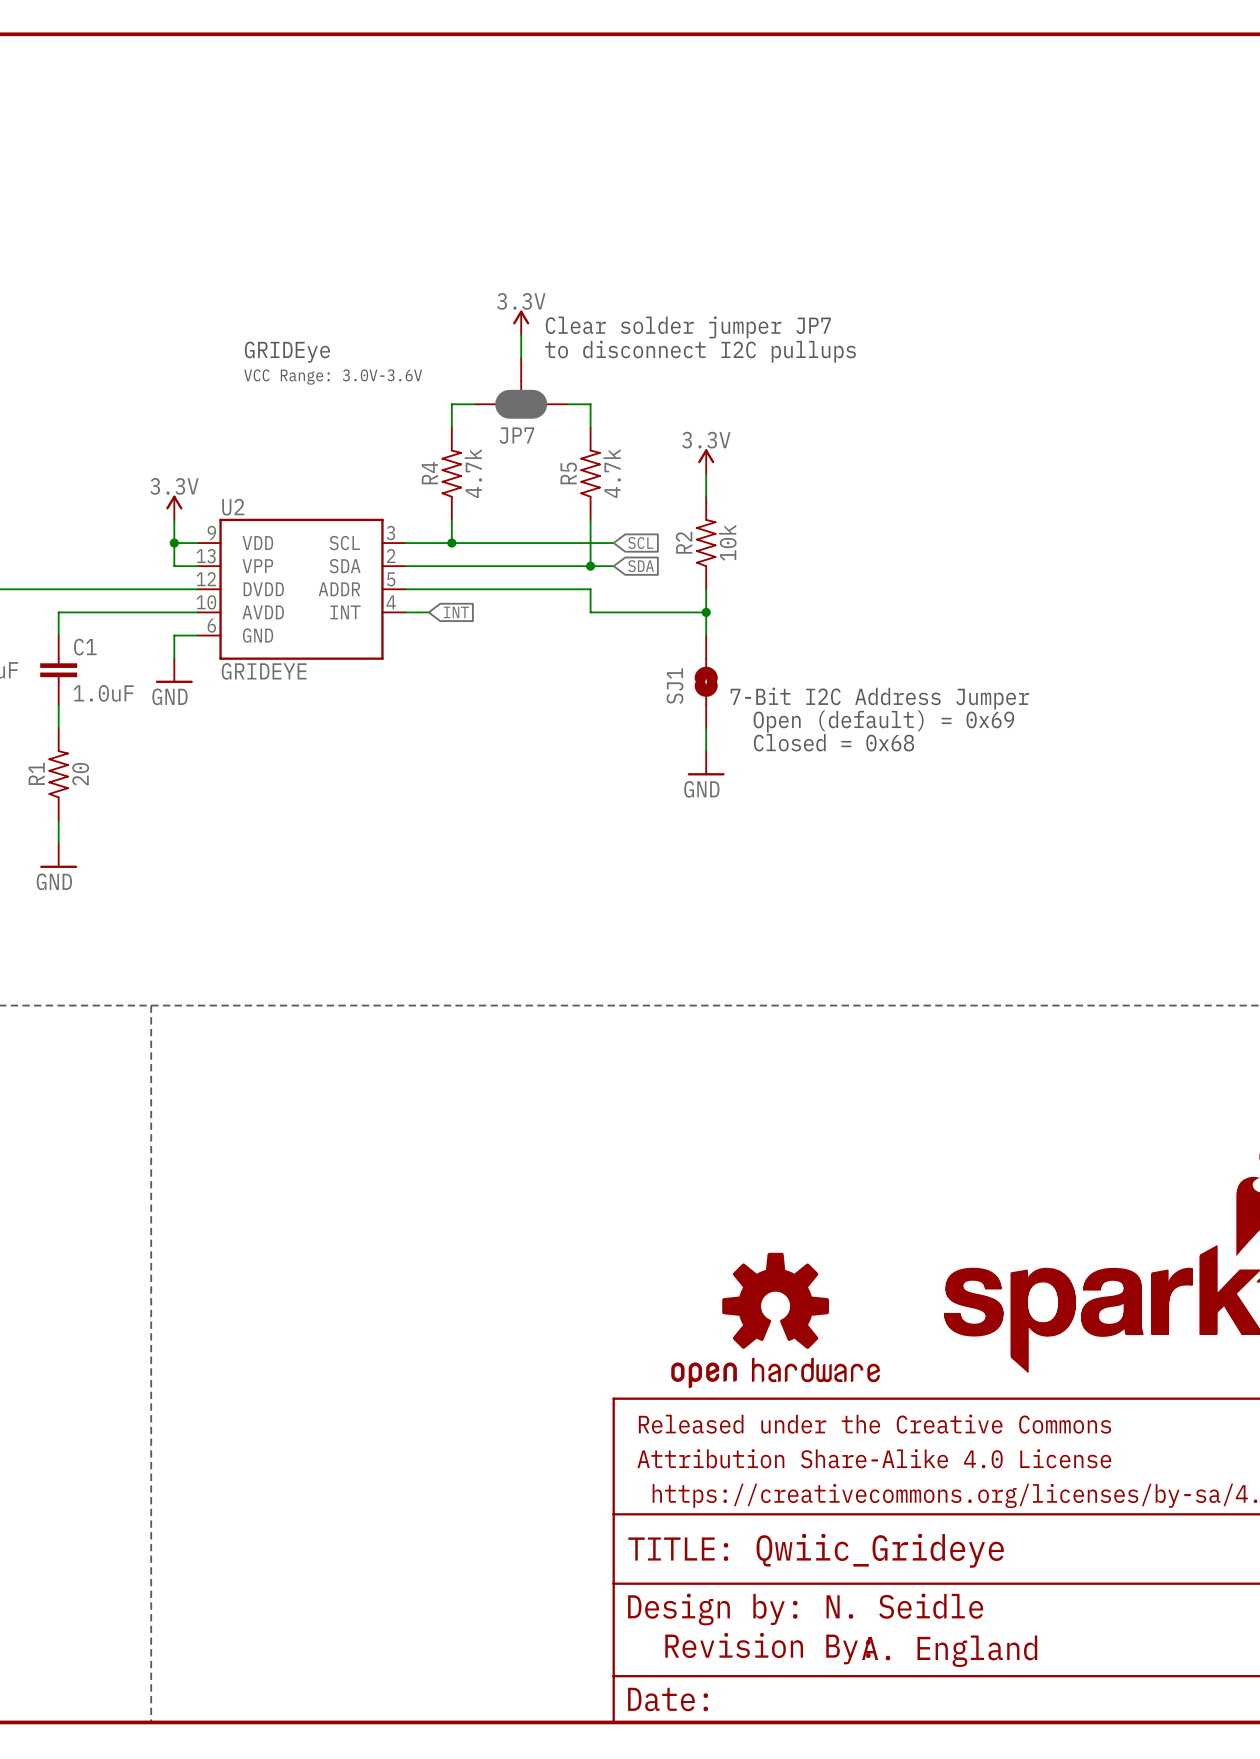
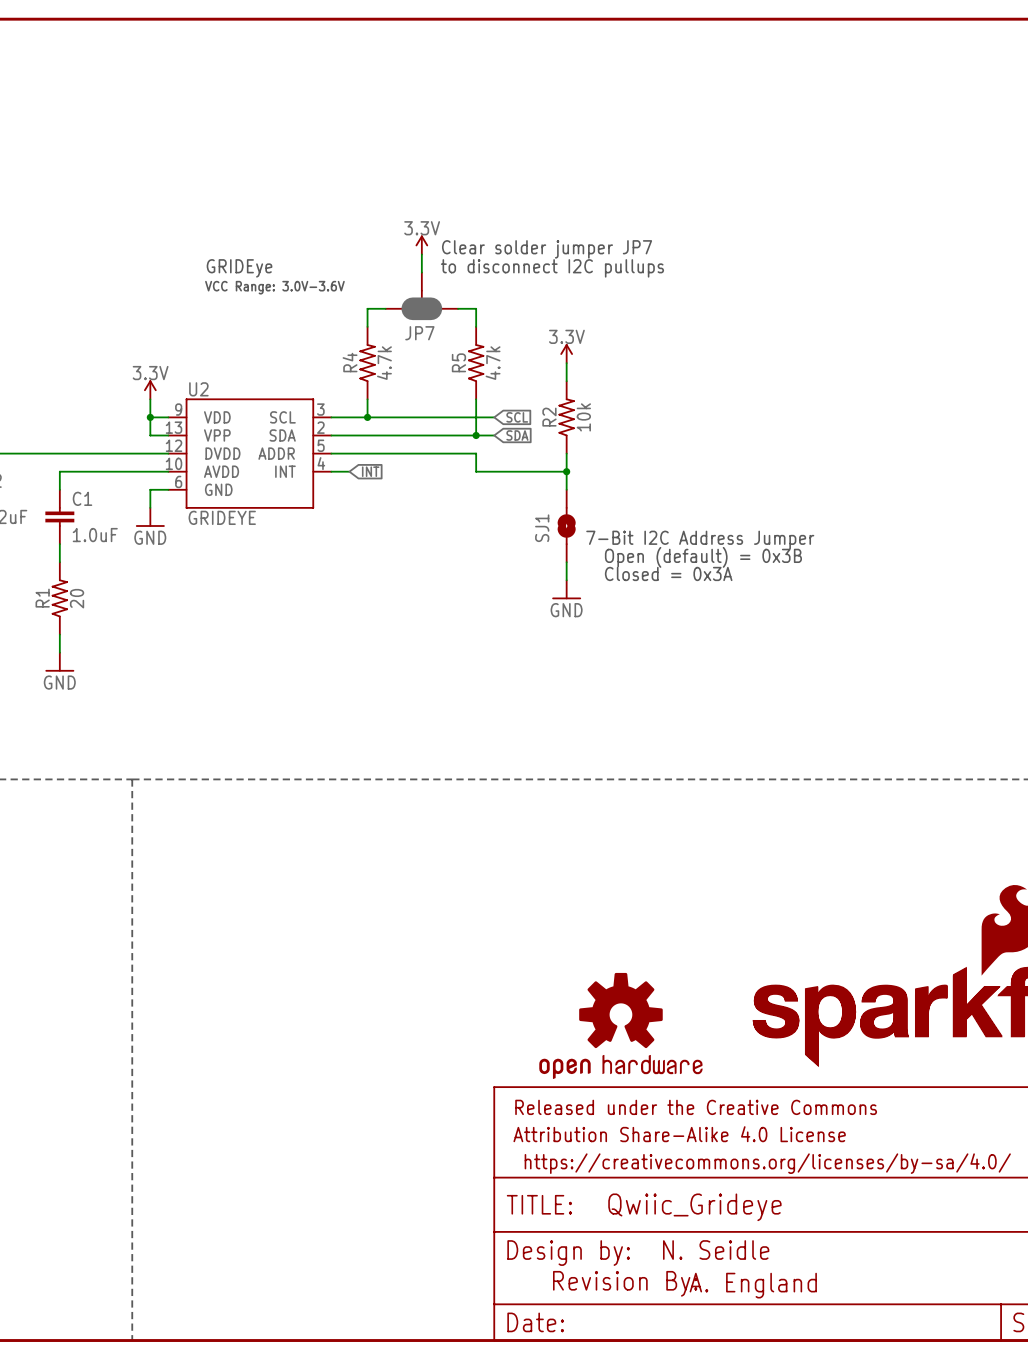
text: Open (default) = 0x69 (883, 721) -> Open (default) = 0x3B (703, 557)
text: Closed = 0x68 (834, 742) -> Closed = 0x3A (668, 573)

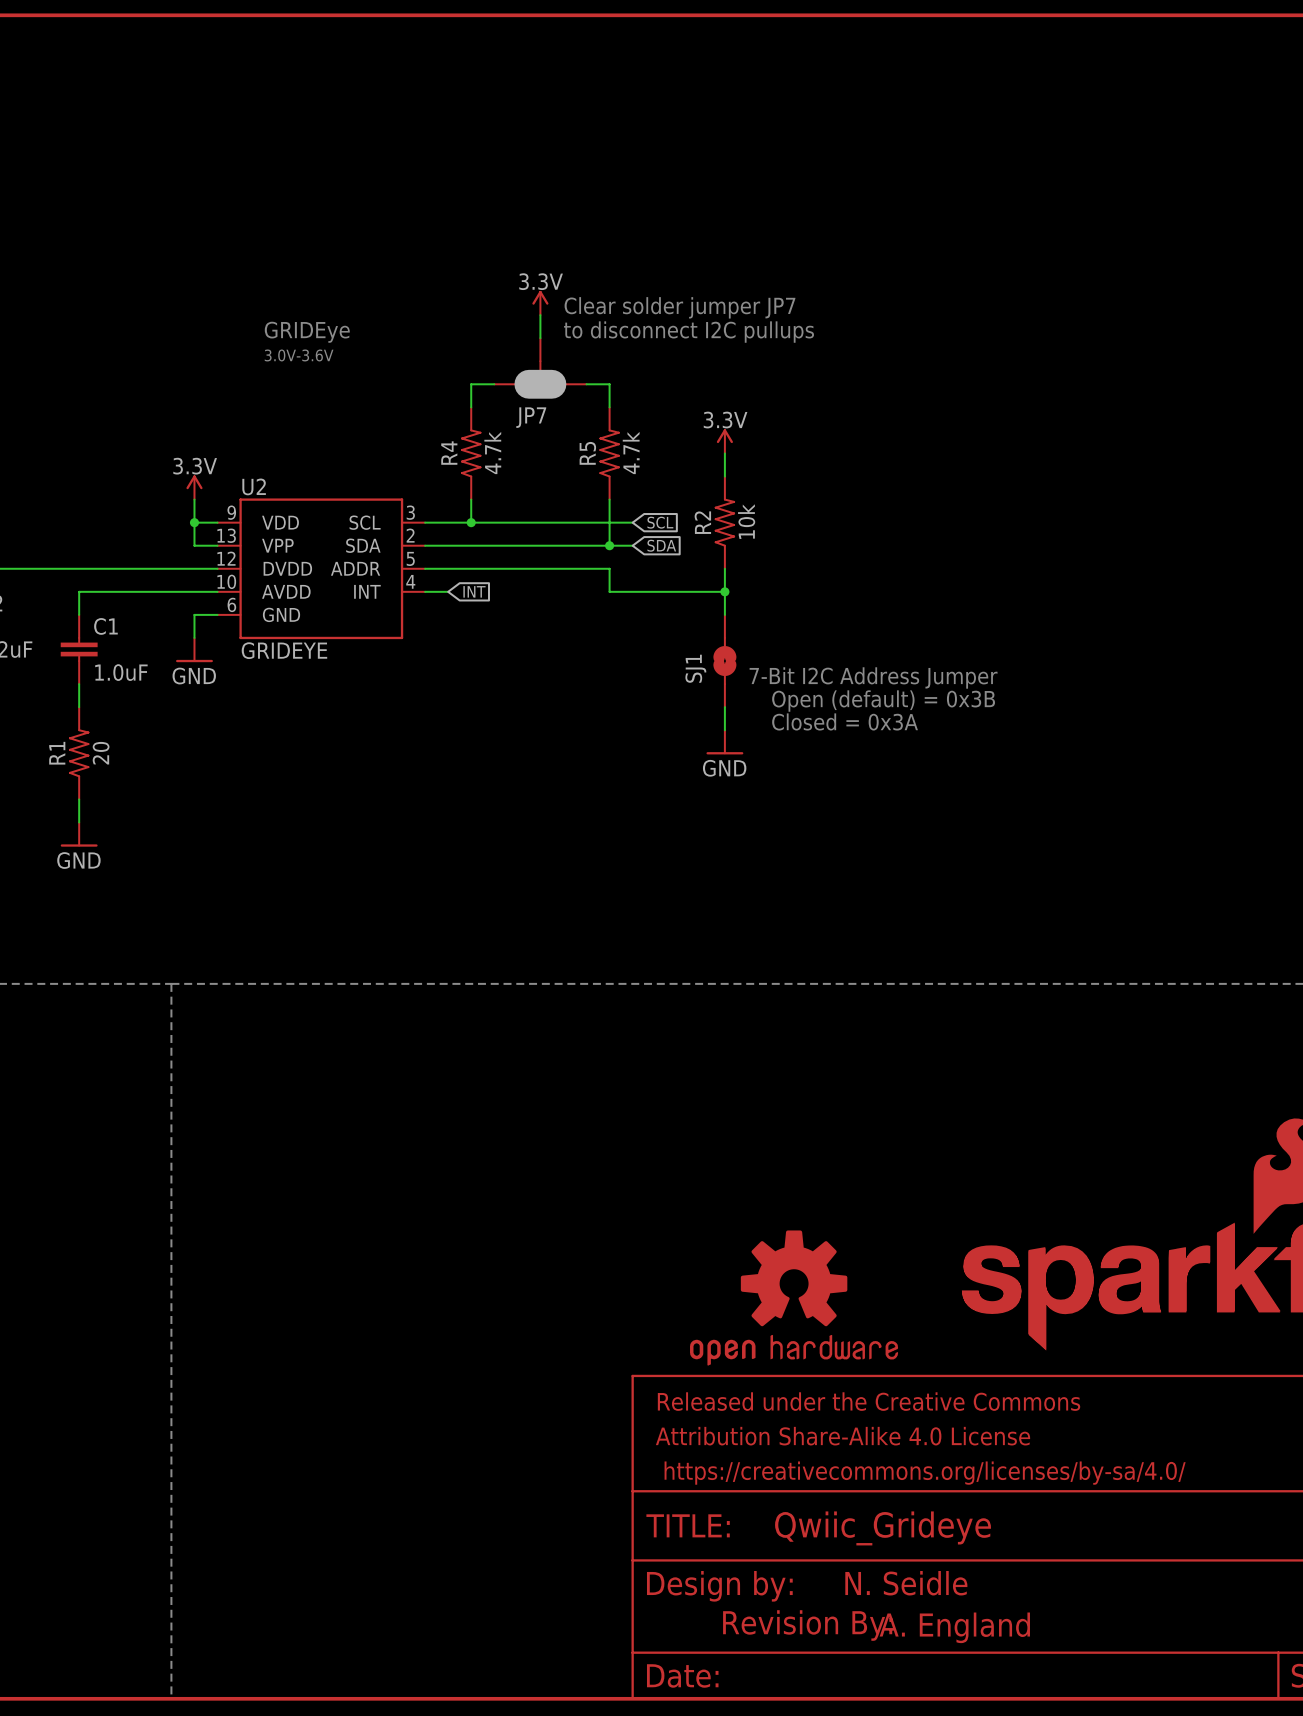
text: VCC Range: 3.0V-3.6V (274, 287) -> 3.0V-3.6V (299, 355)

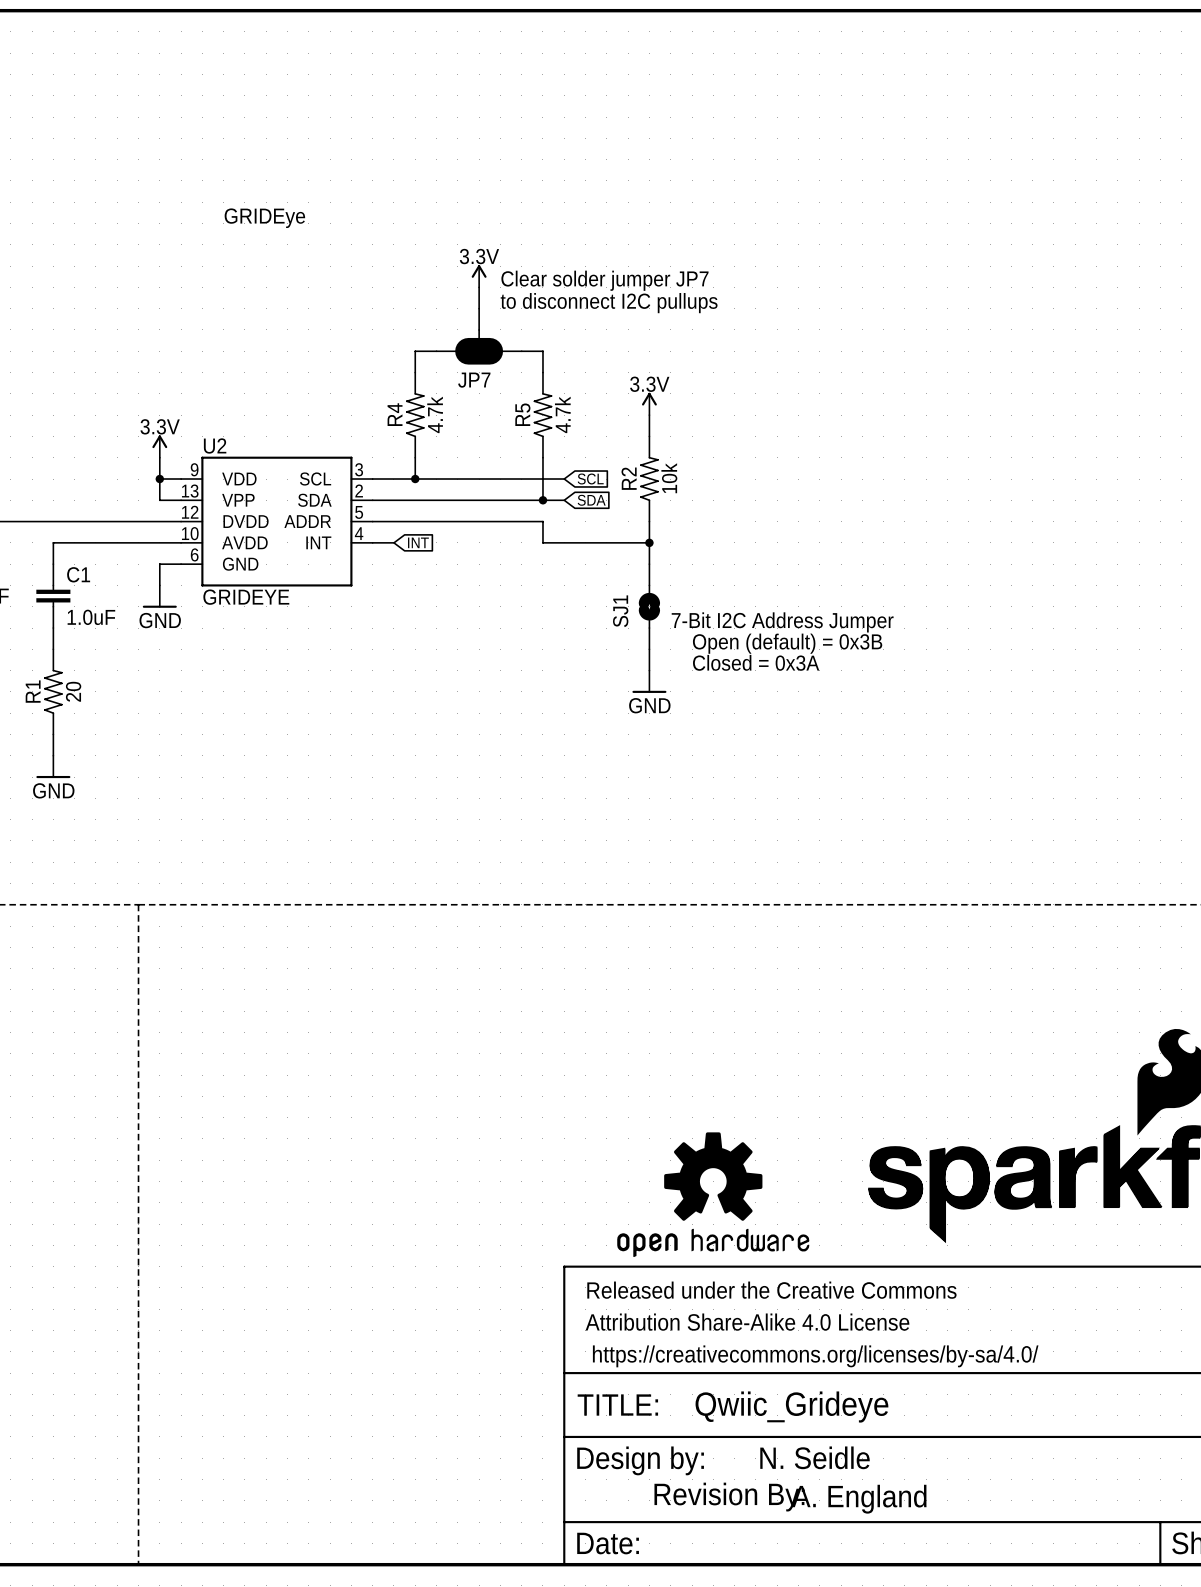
text position: GRIDEye (307, 332) -> GRIDEye (264, 218)
text: 3.0V-3.6V (299, 355) -> none

